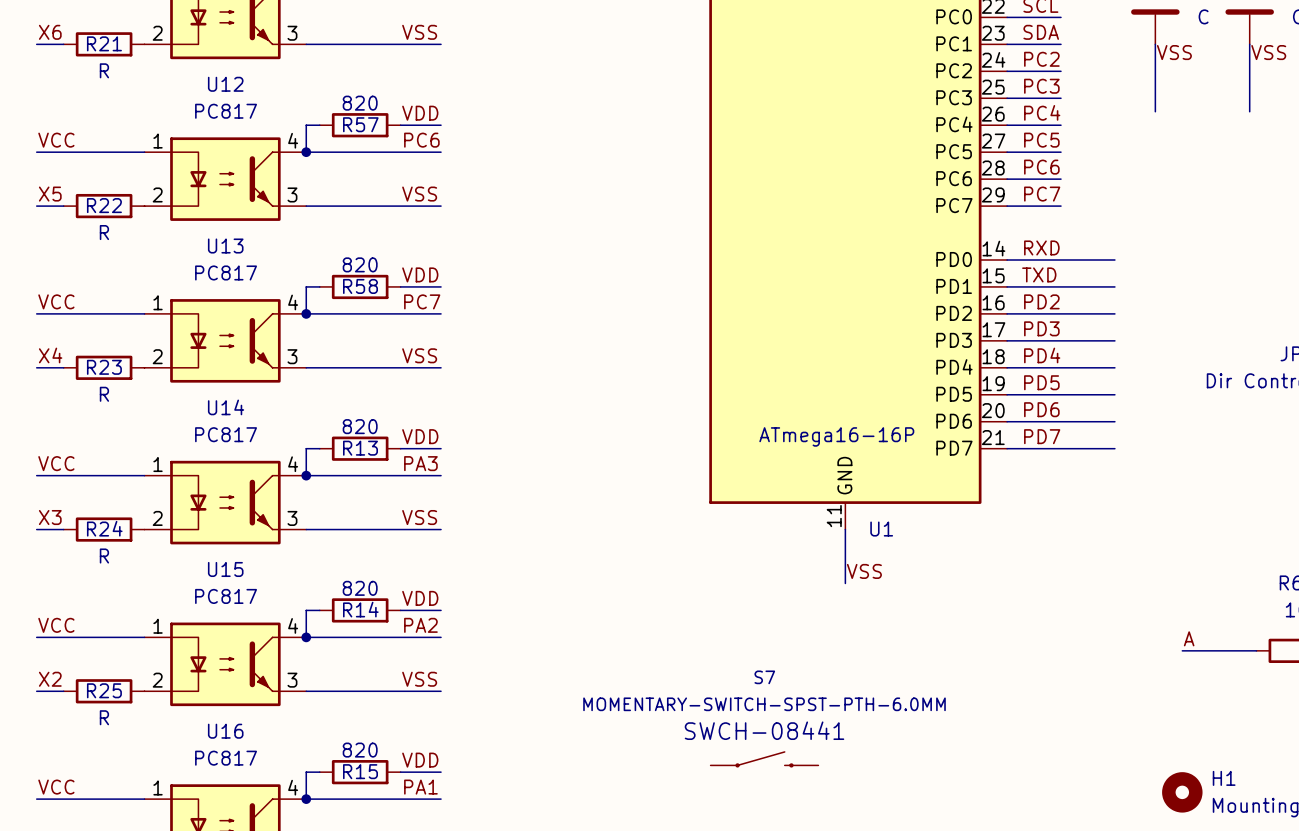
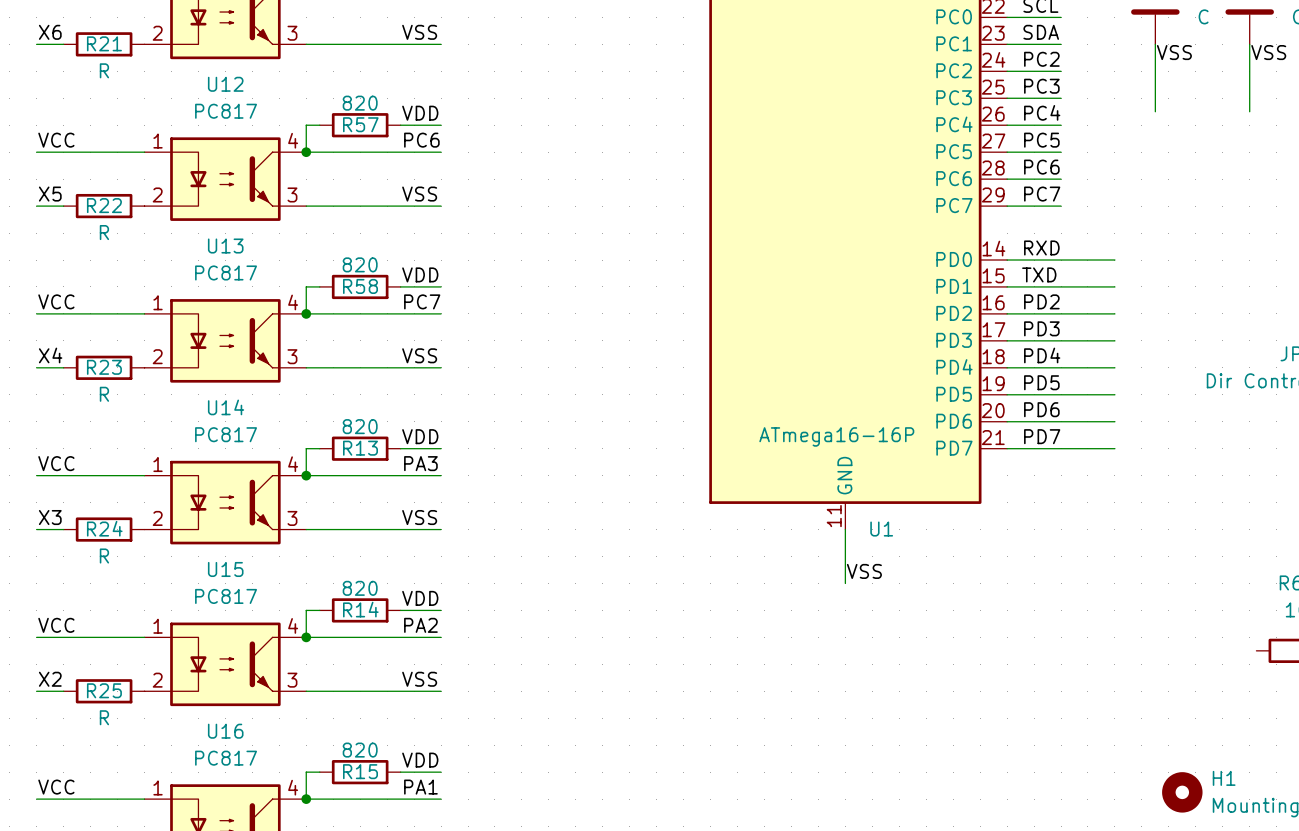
label: A (1189, 638) -> none
wire: (1182, 650) (1256, 650) -> none
S7: MOMENTARY-SWITCH-SPST-PTH-6.0MM (764, 759) -> none

